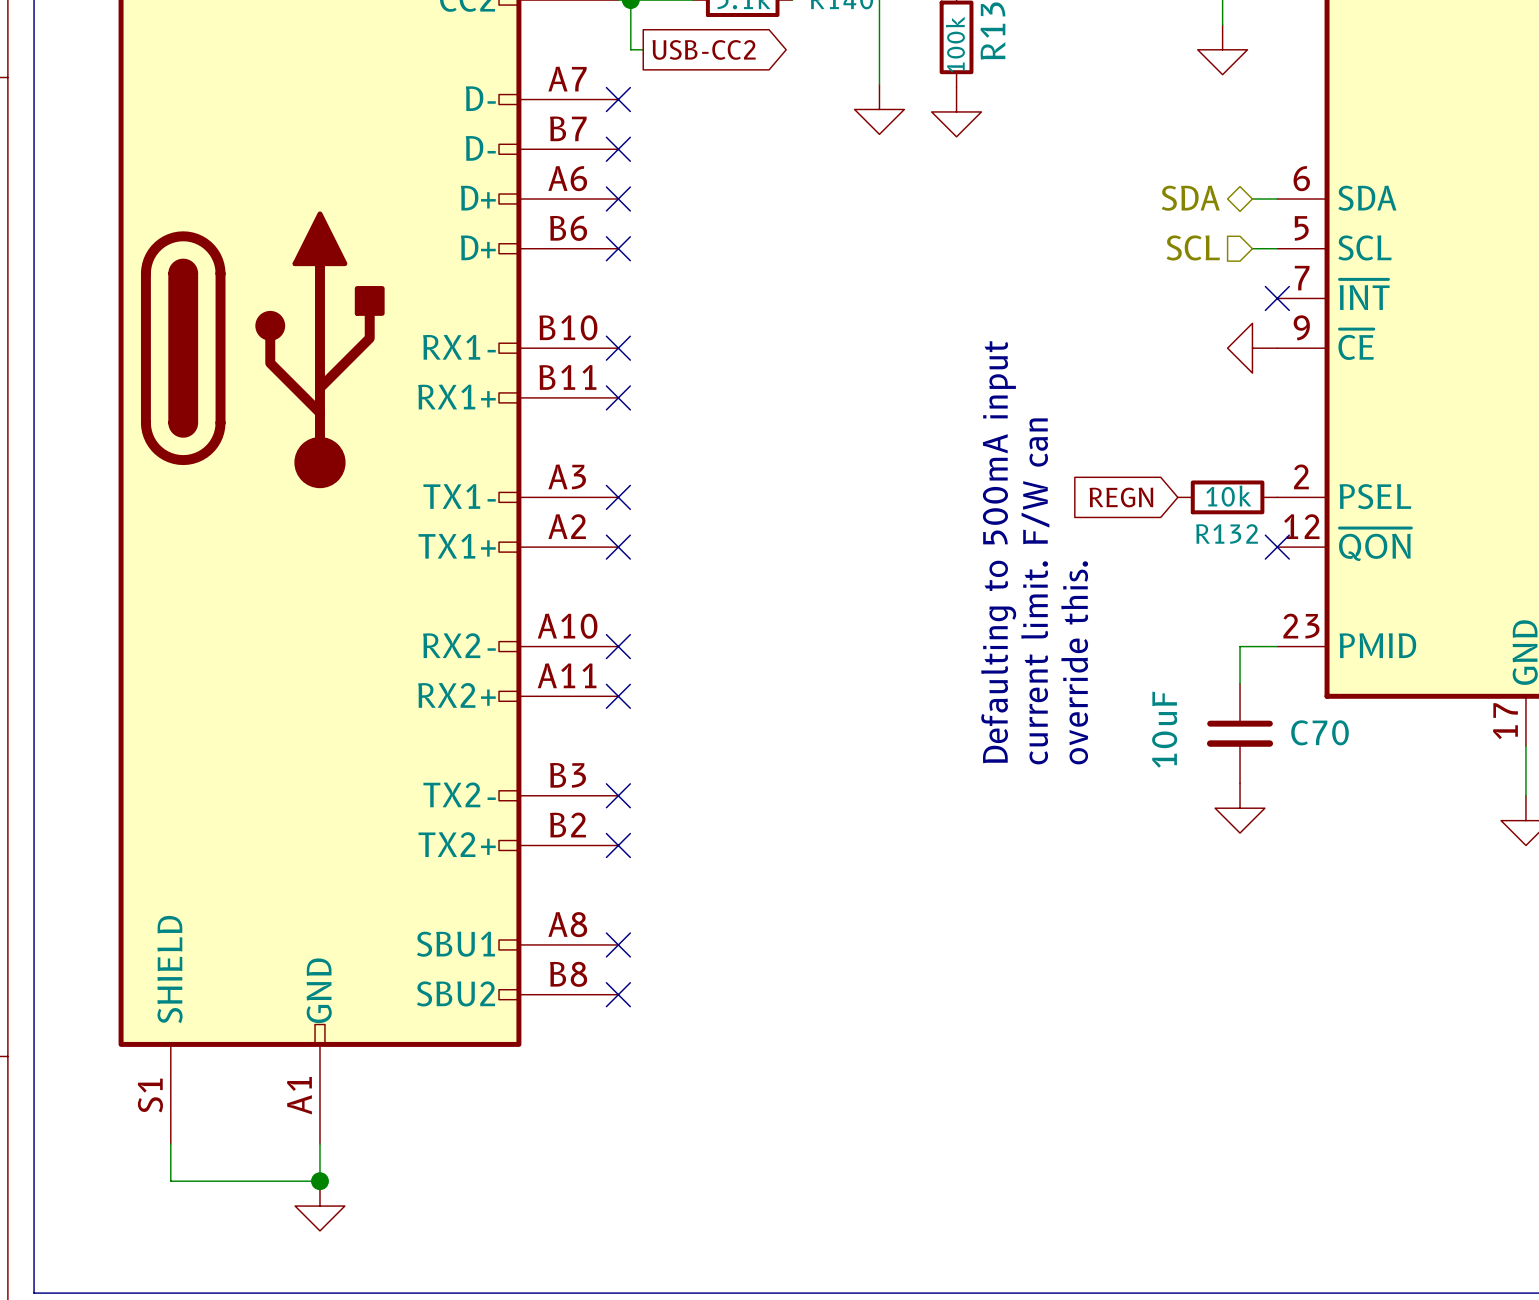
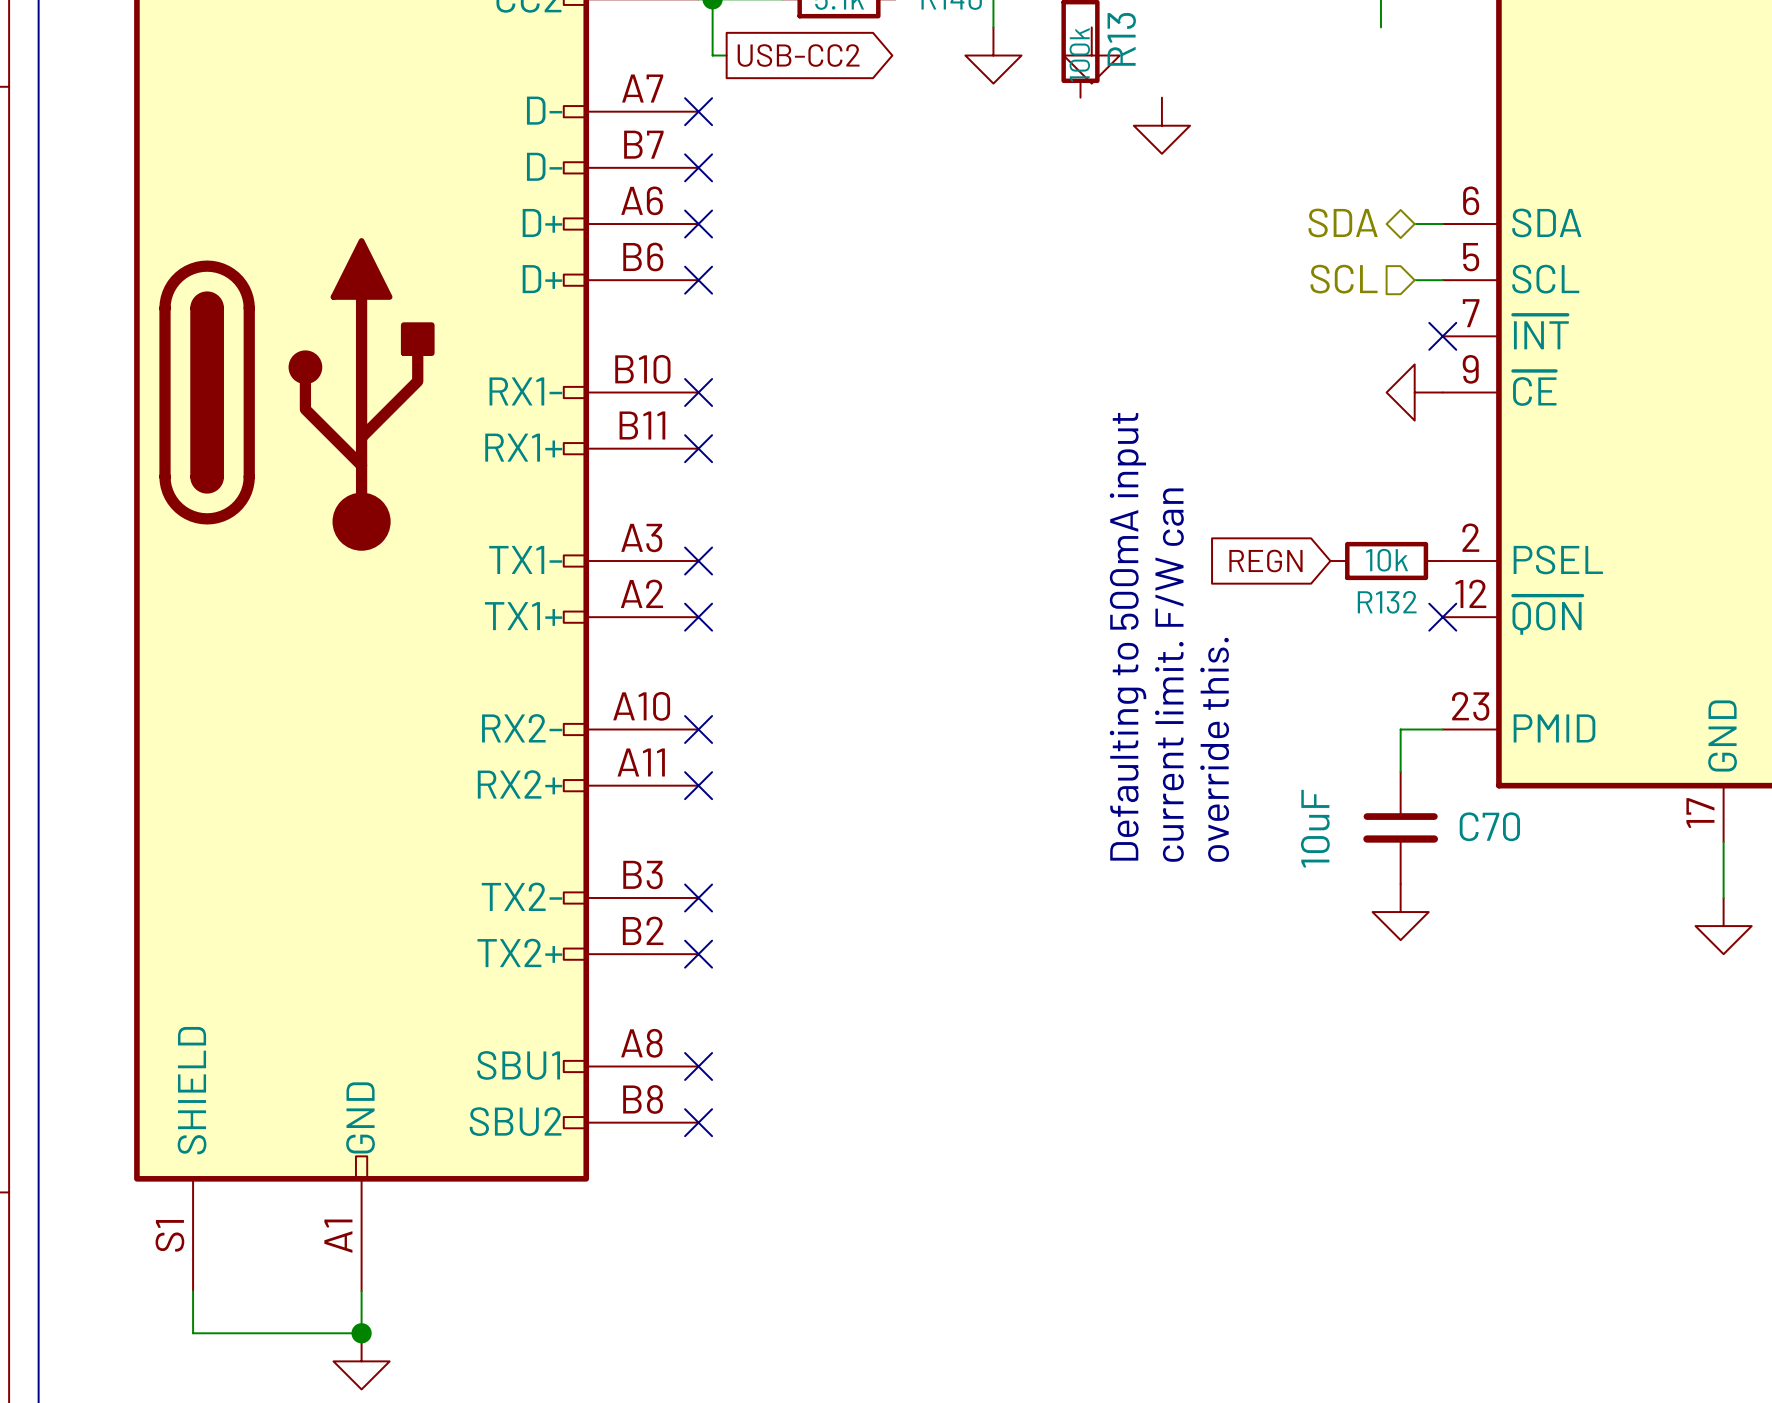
wire: (879, 24) (879, 84) -> none
power symbol: none -> (993, 55)
power symbol: none -> (1091, 55)
power symbol: (1222, 49) -> none
power symbol: (879, 109) -> none
power symbol: (956, 111) -> none
power symbol: none -> (1161, 125)

